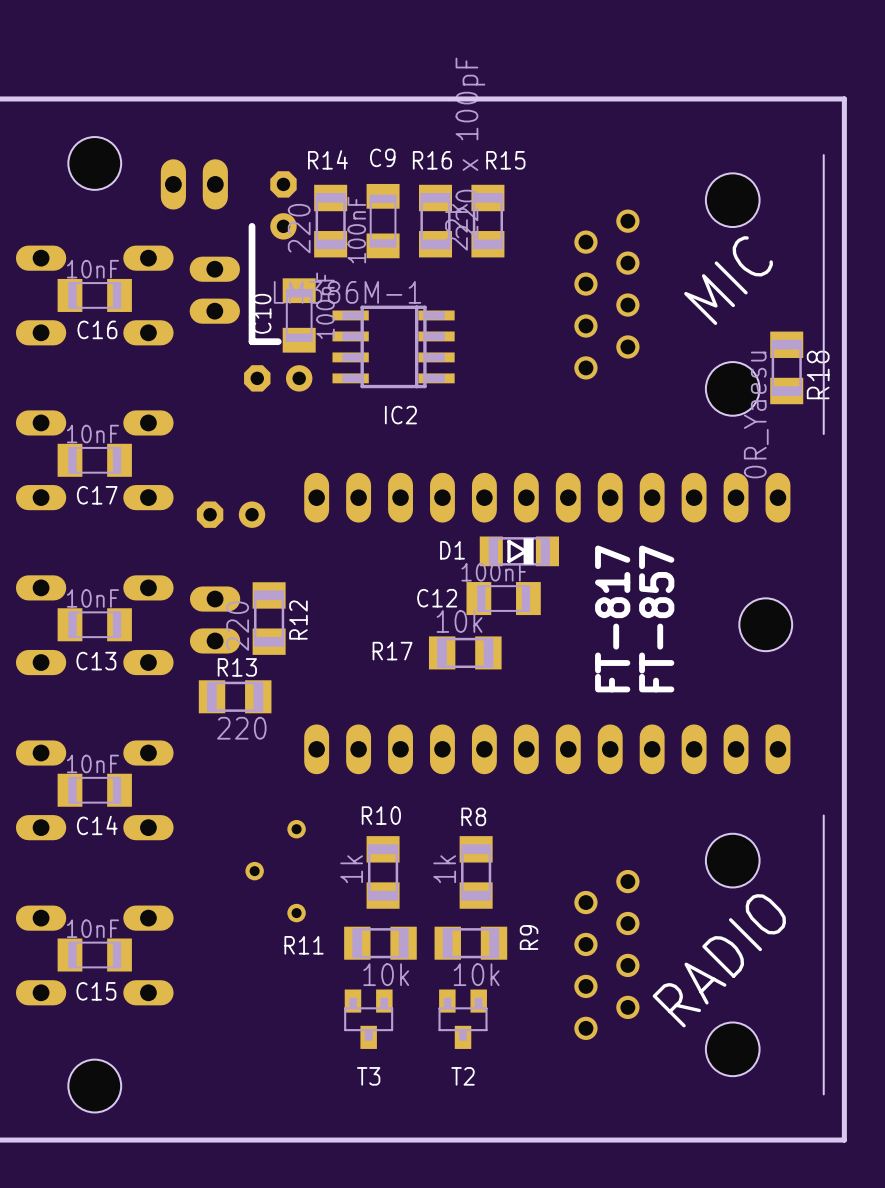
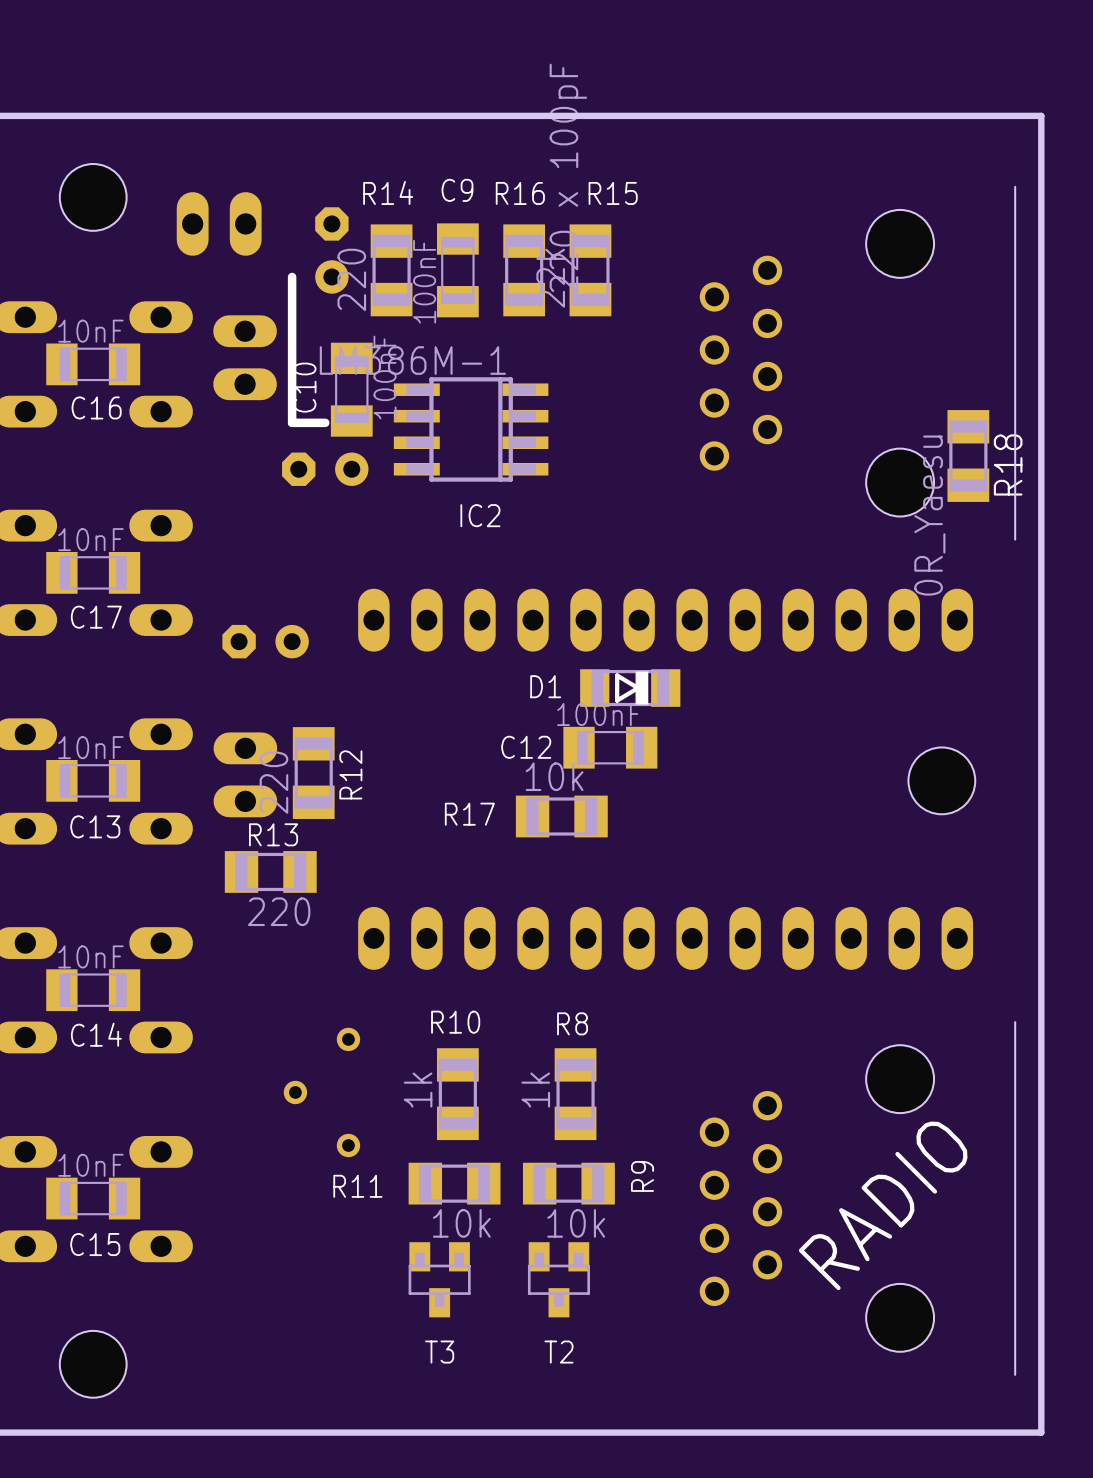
text: MIC (728, 280) -> none
text: FT-817 (612, 618) -> none
text: FT-857 (656, 618) -> none

